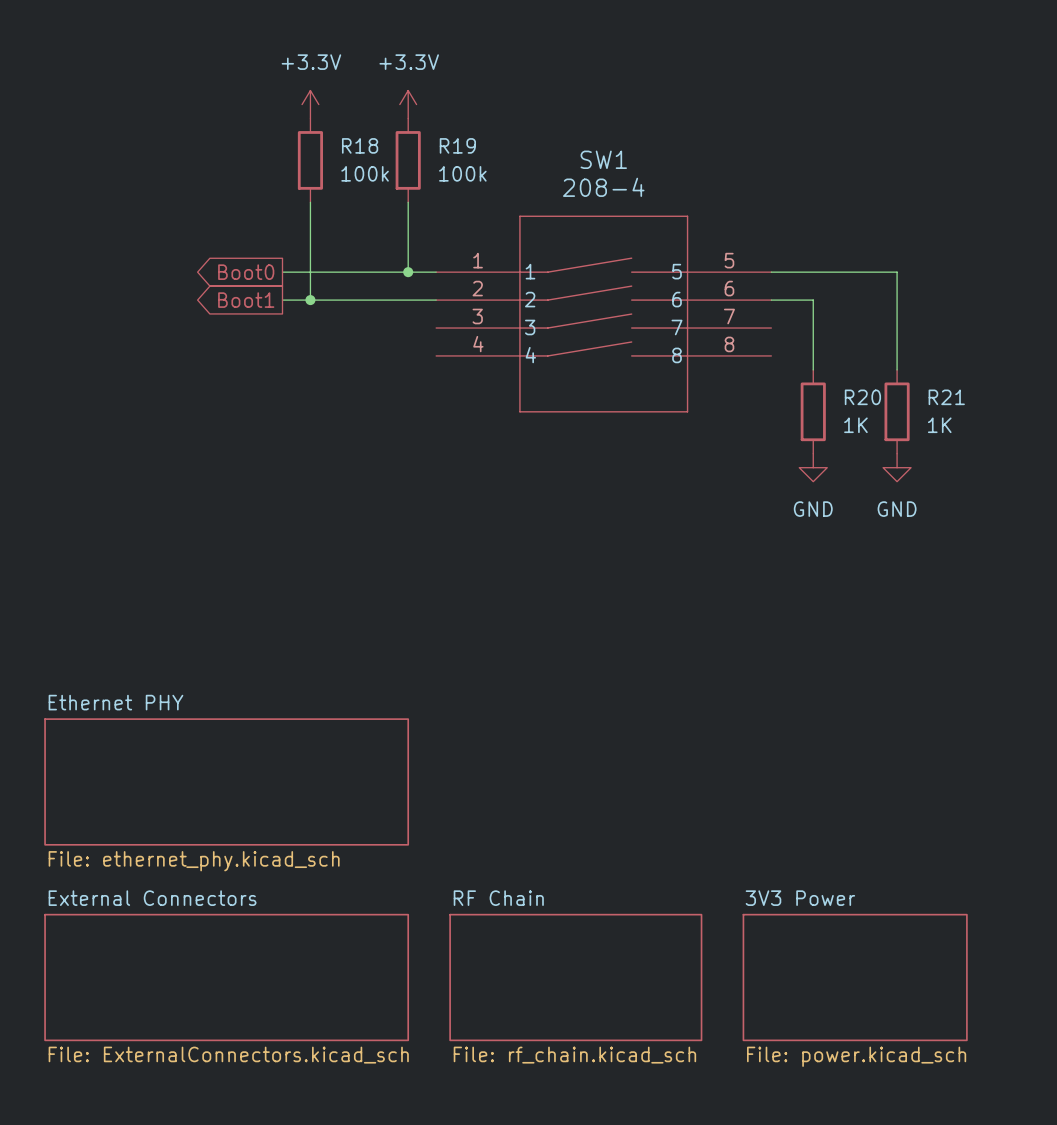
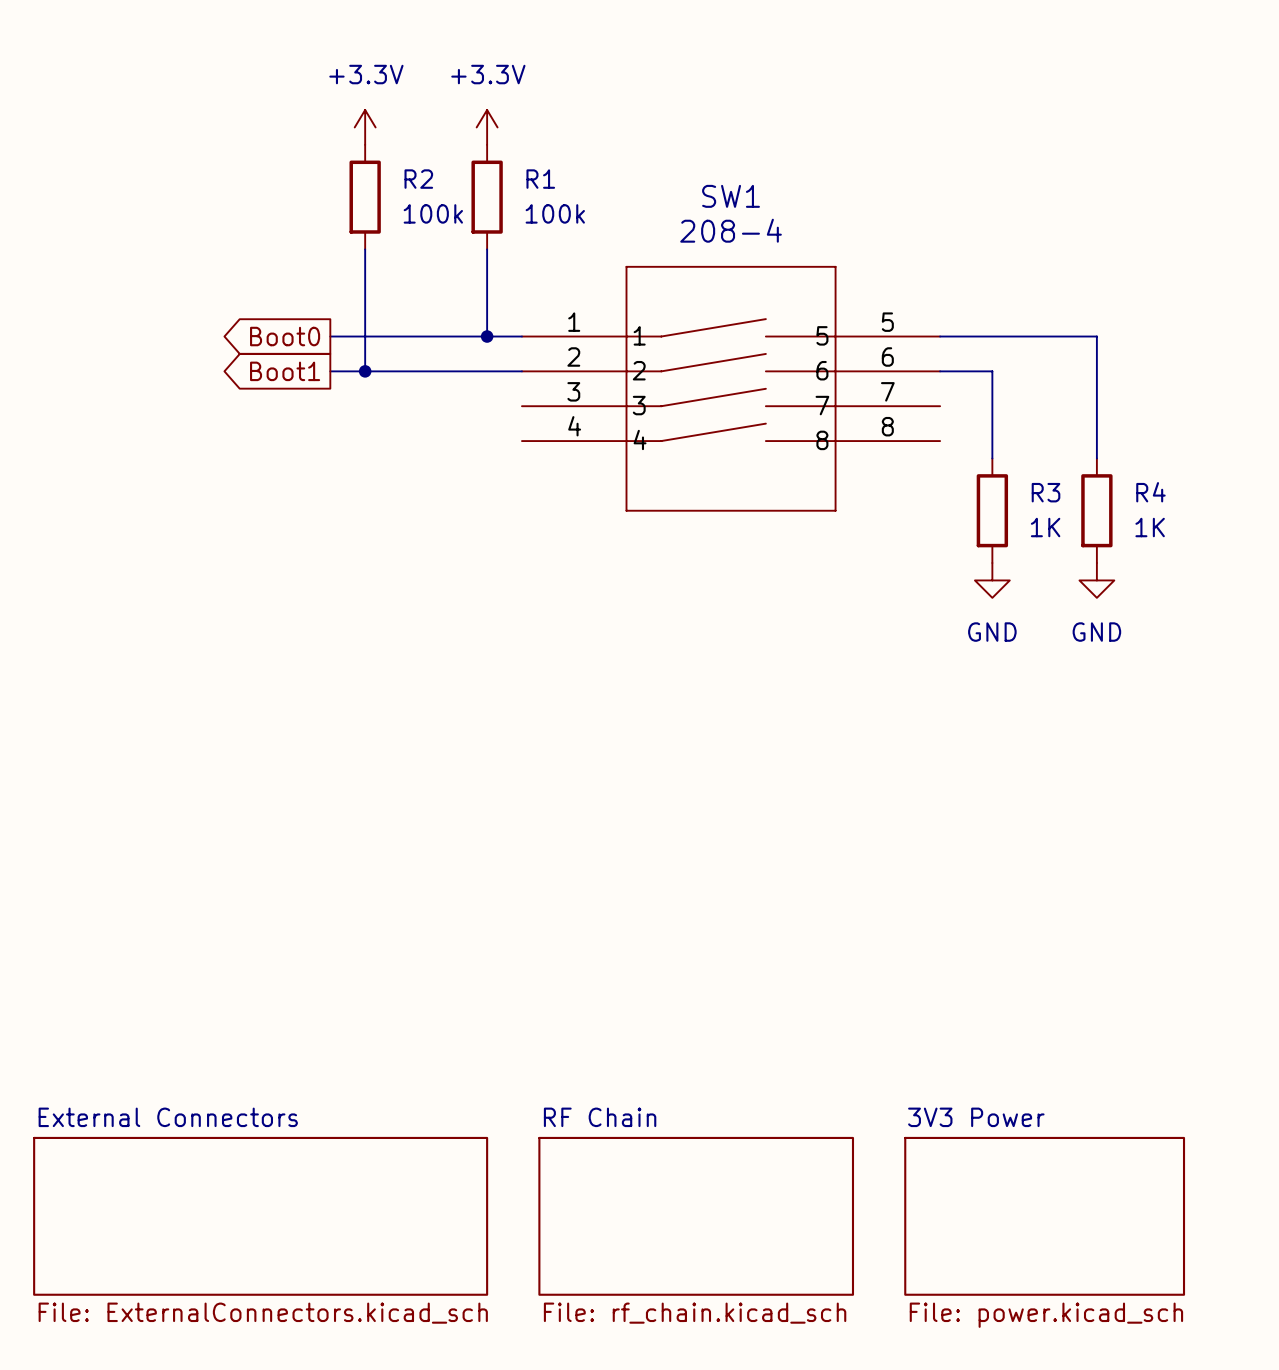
R18 name: R18 (360, 145) -> R2 (418, 179)
R19 name: R19 (457, 145) -> R1 (540, 179)
R20 name: R20 (862, 397) -> R3 (1046, 492)
R21 name: R21 (946, 397) -> R4 (1150, 492)
sheet Ethernet PHY: File: ethernet_phy.kicad_sch (226, 781) -> none

